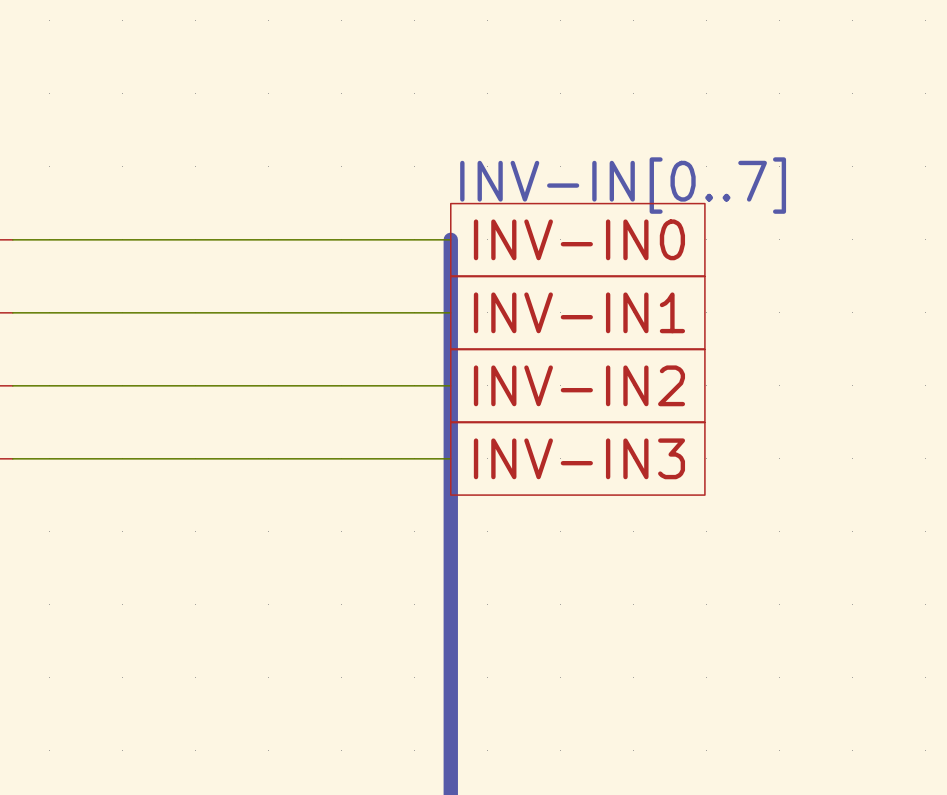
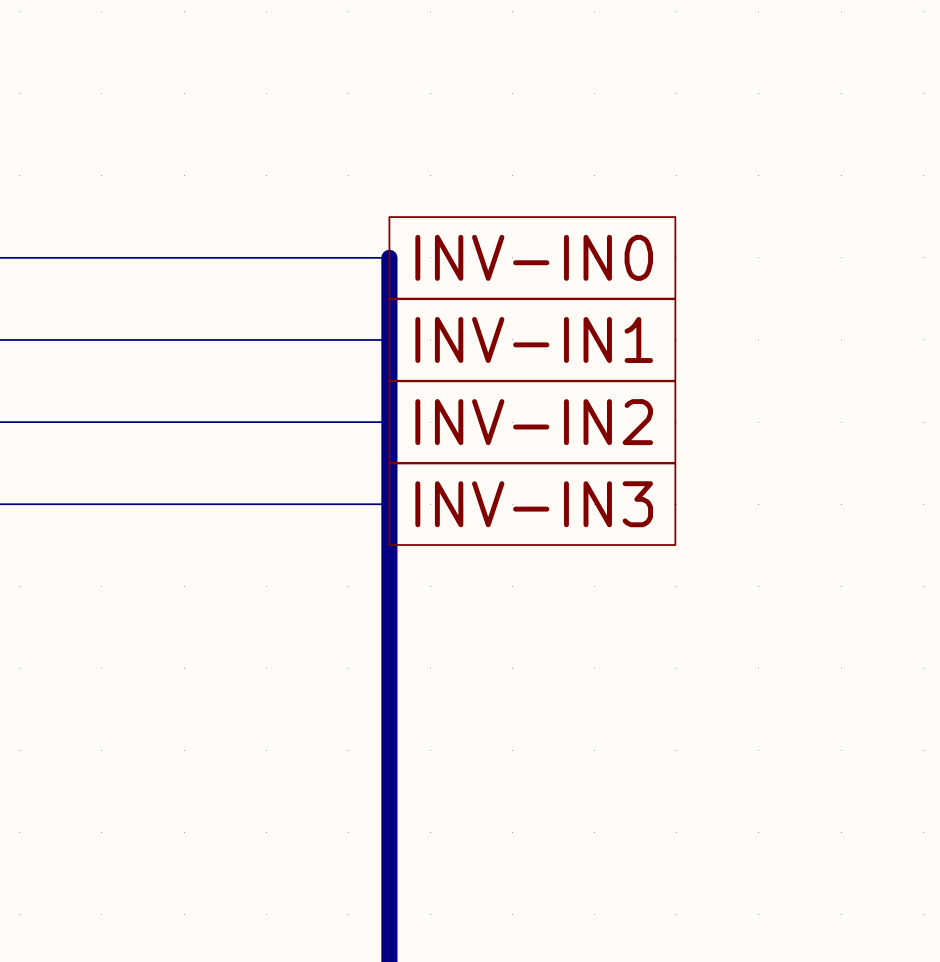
text: INV-IN[0..7] (623, 185) -> none

